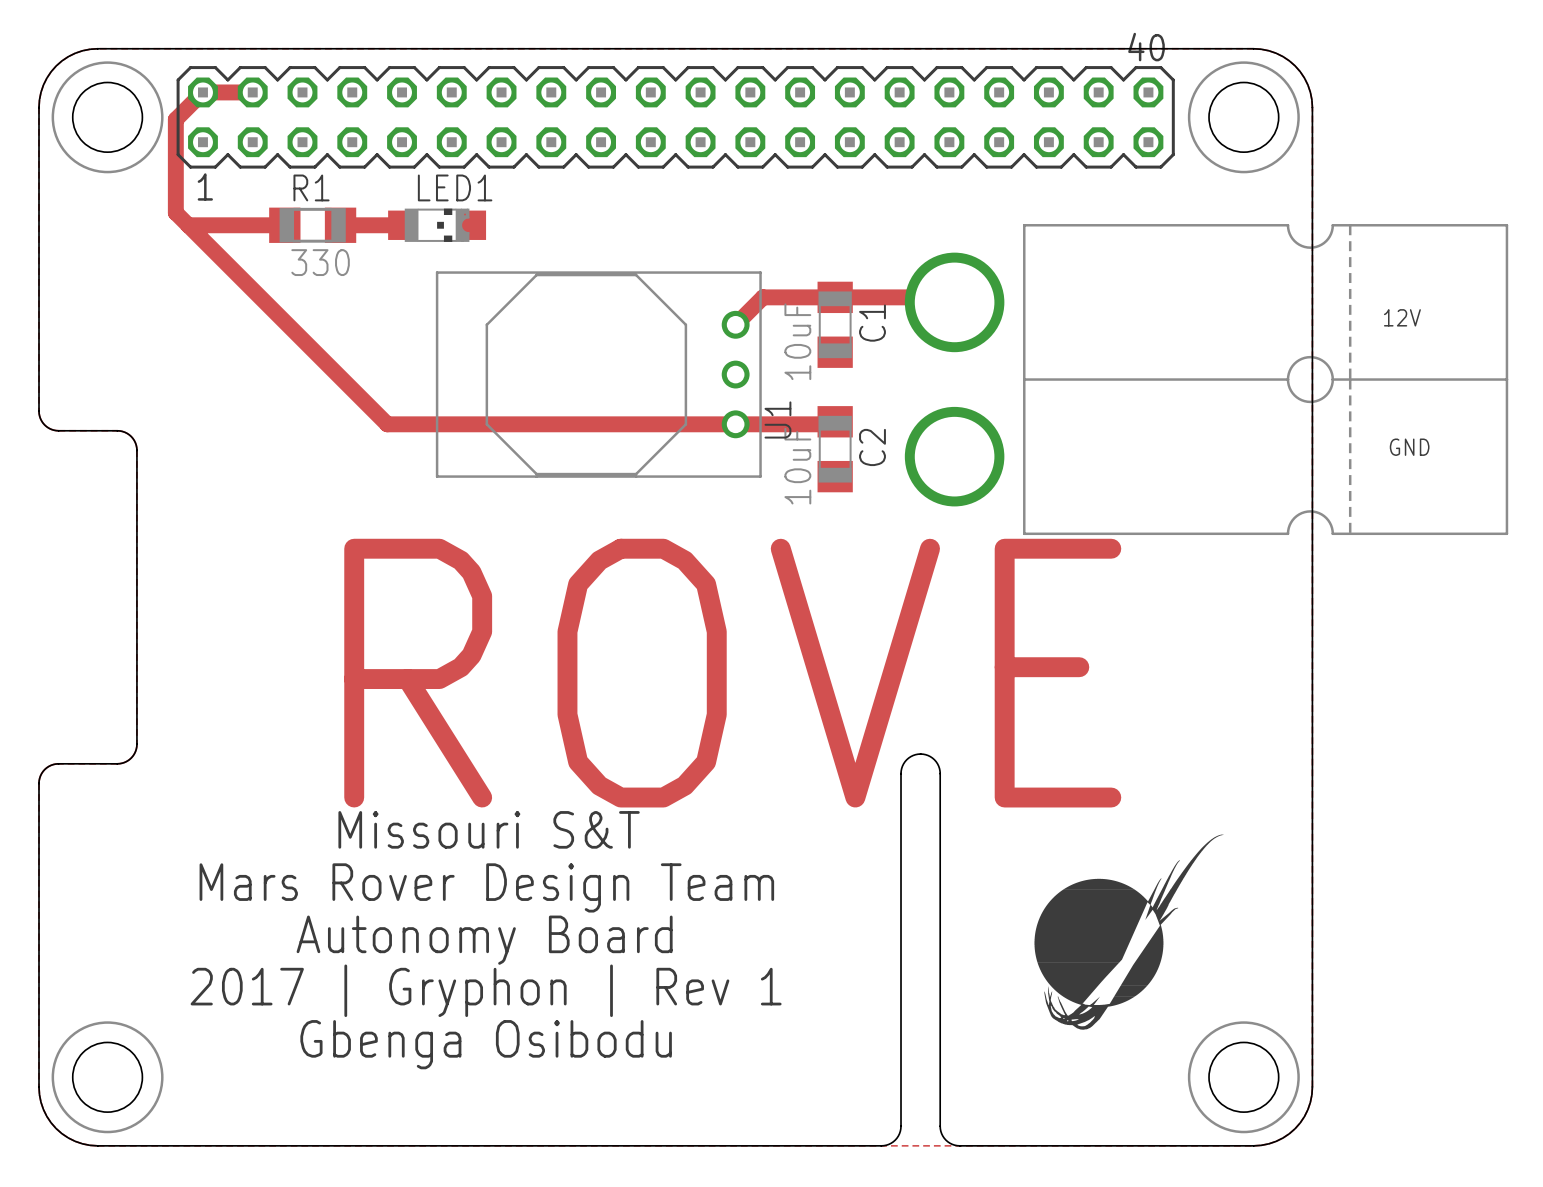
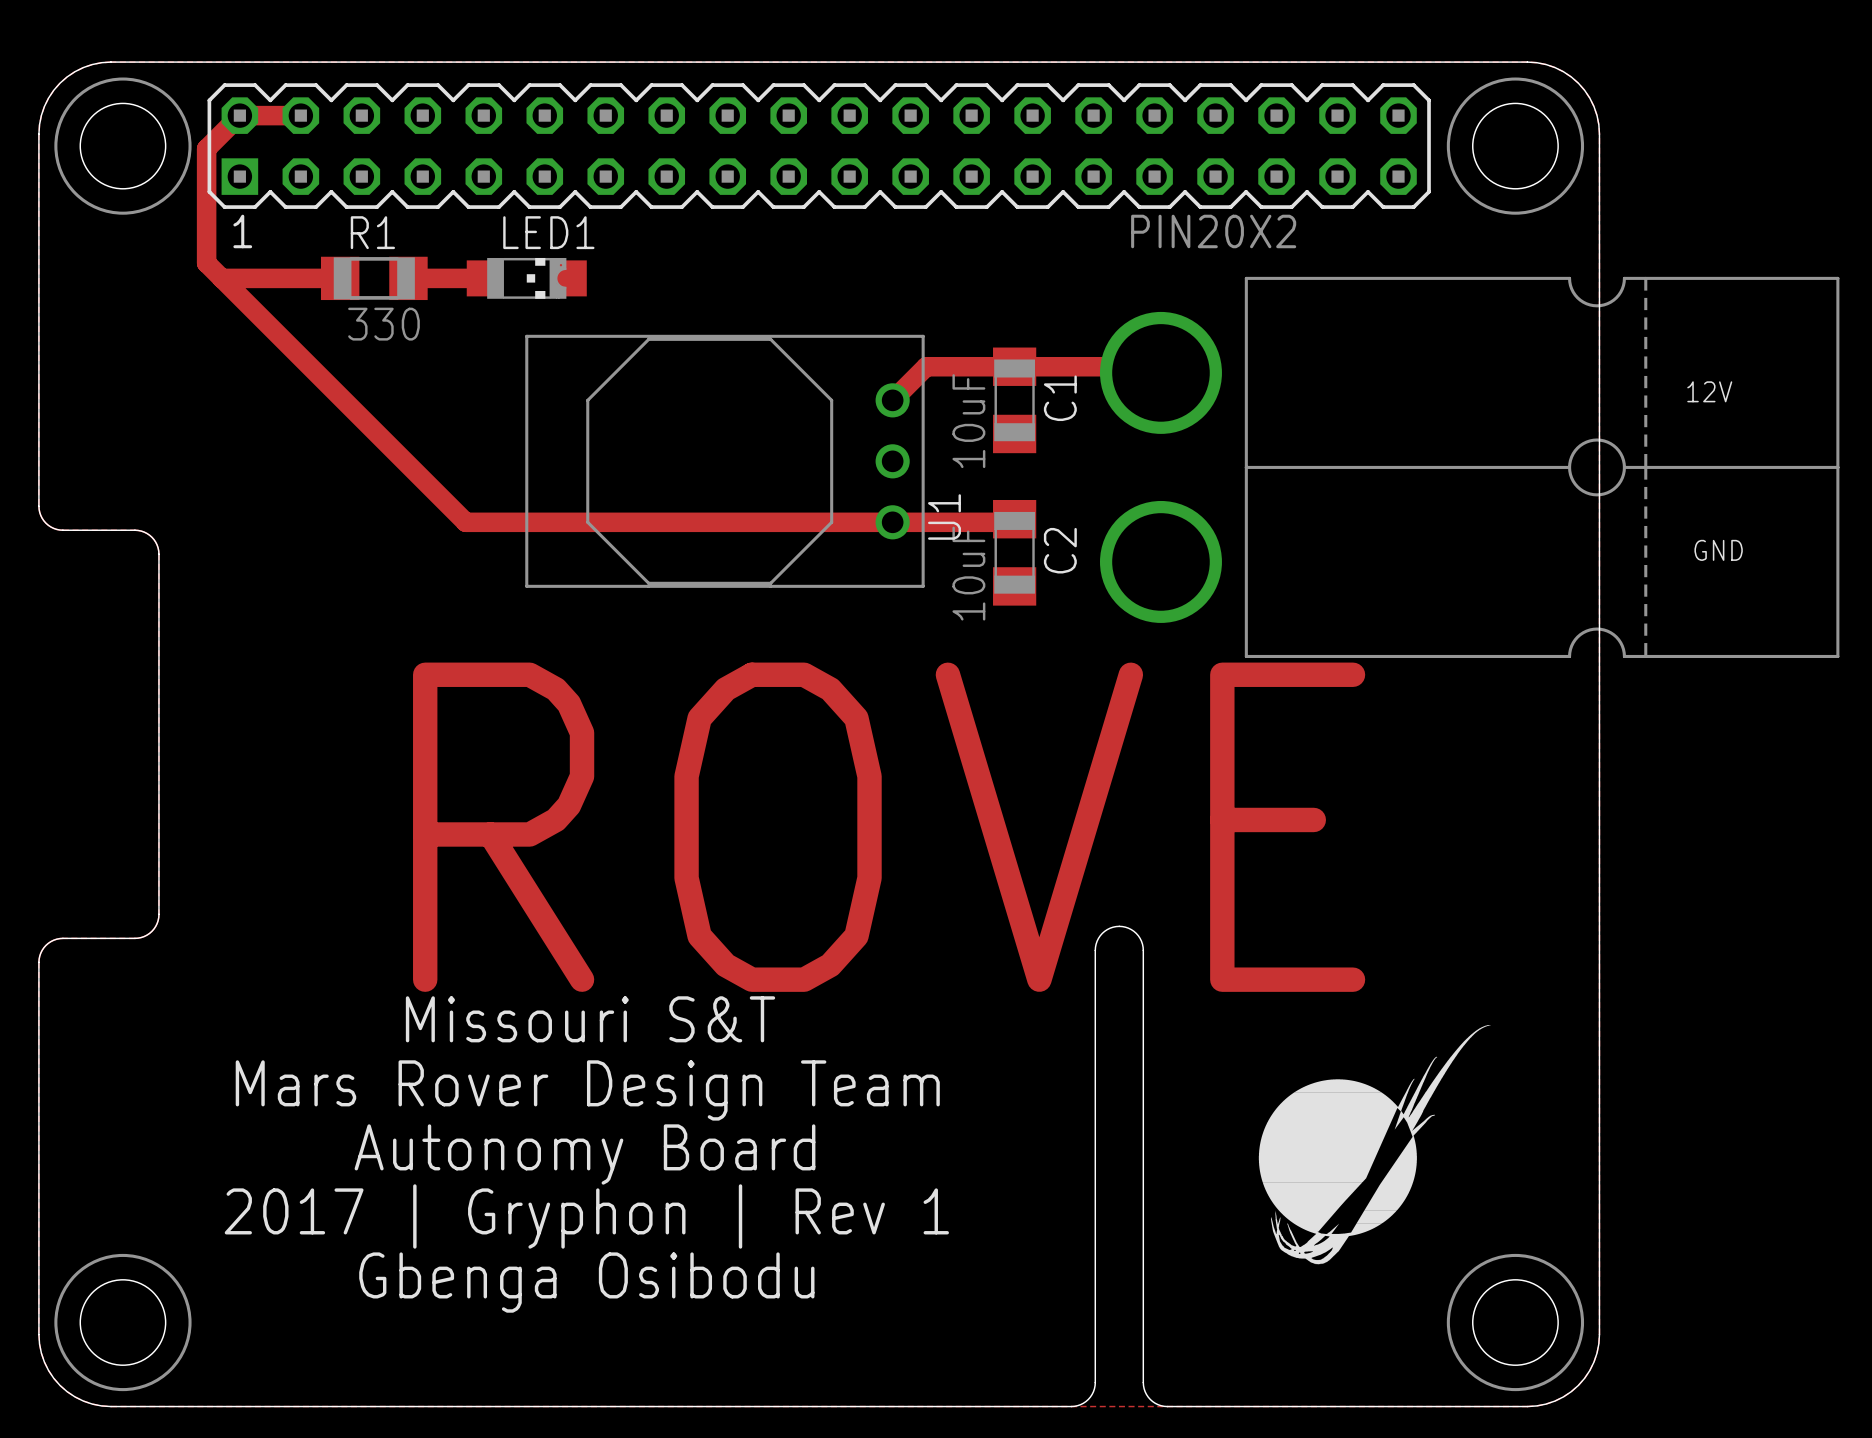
part footprint: [176, 66, 1175, 169] -> [207, 83, 1431, 209]
part value: none -> PIN20X2 (1213, 231)

